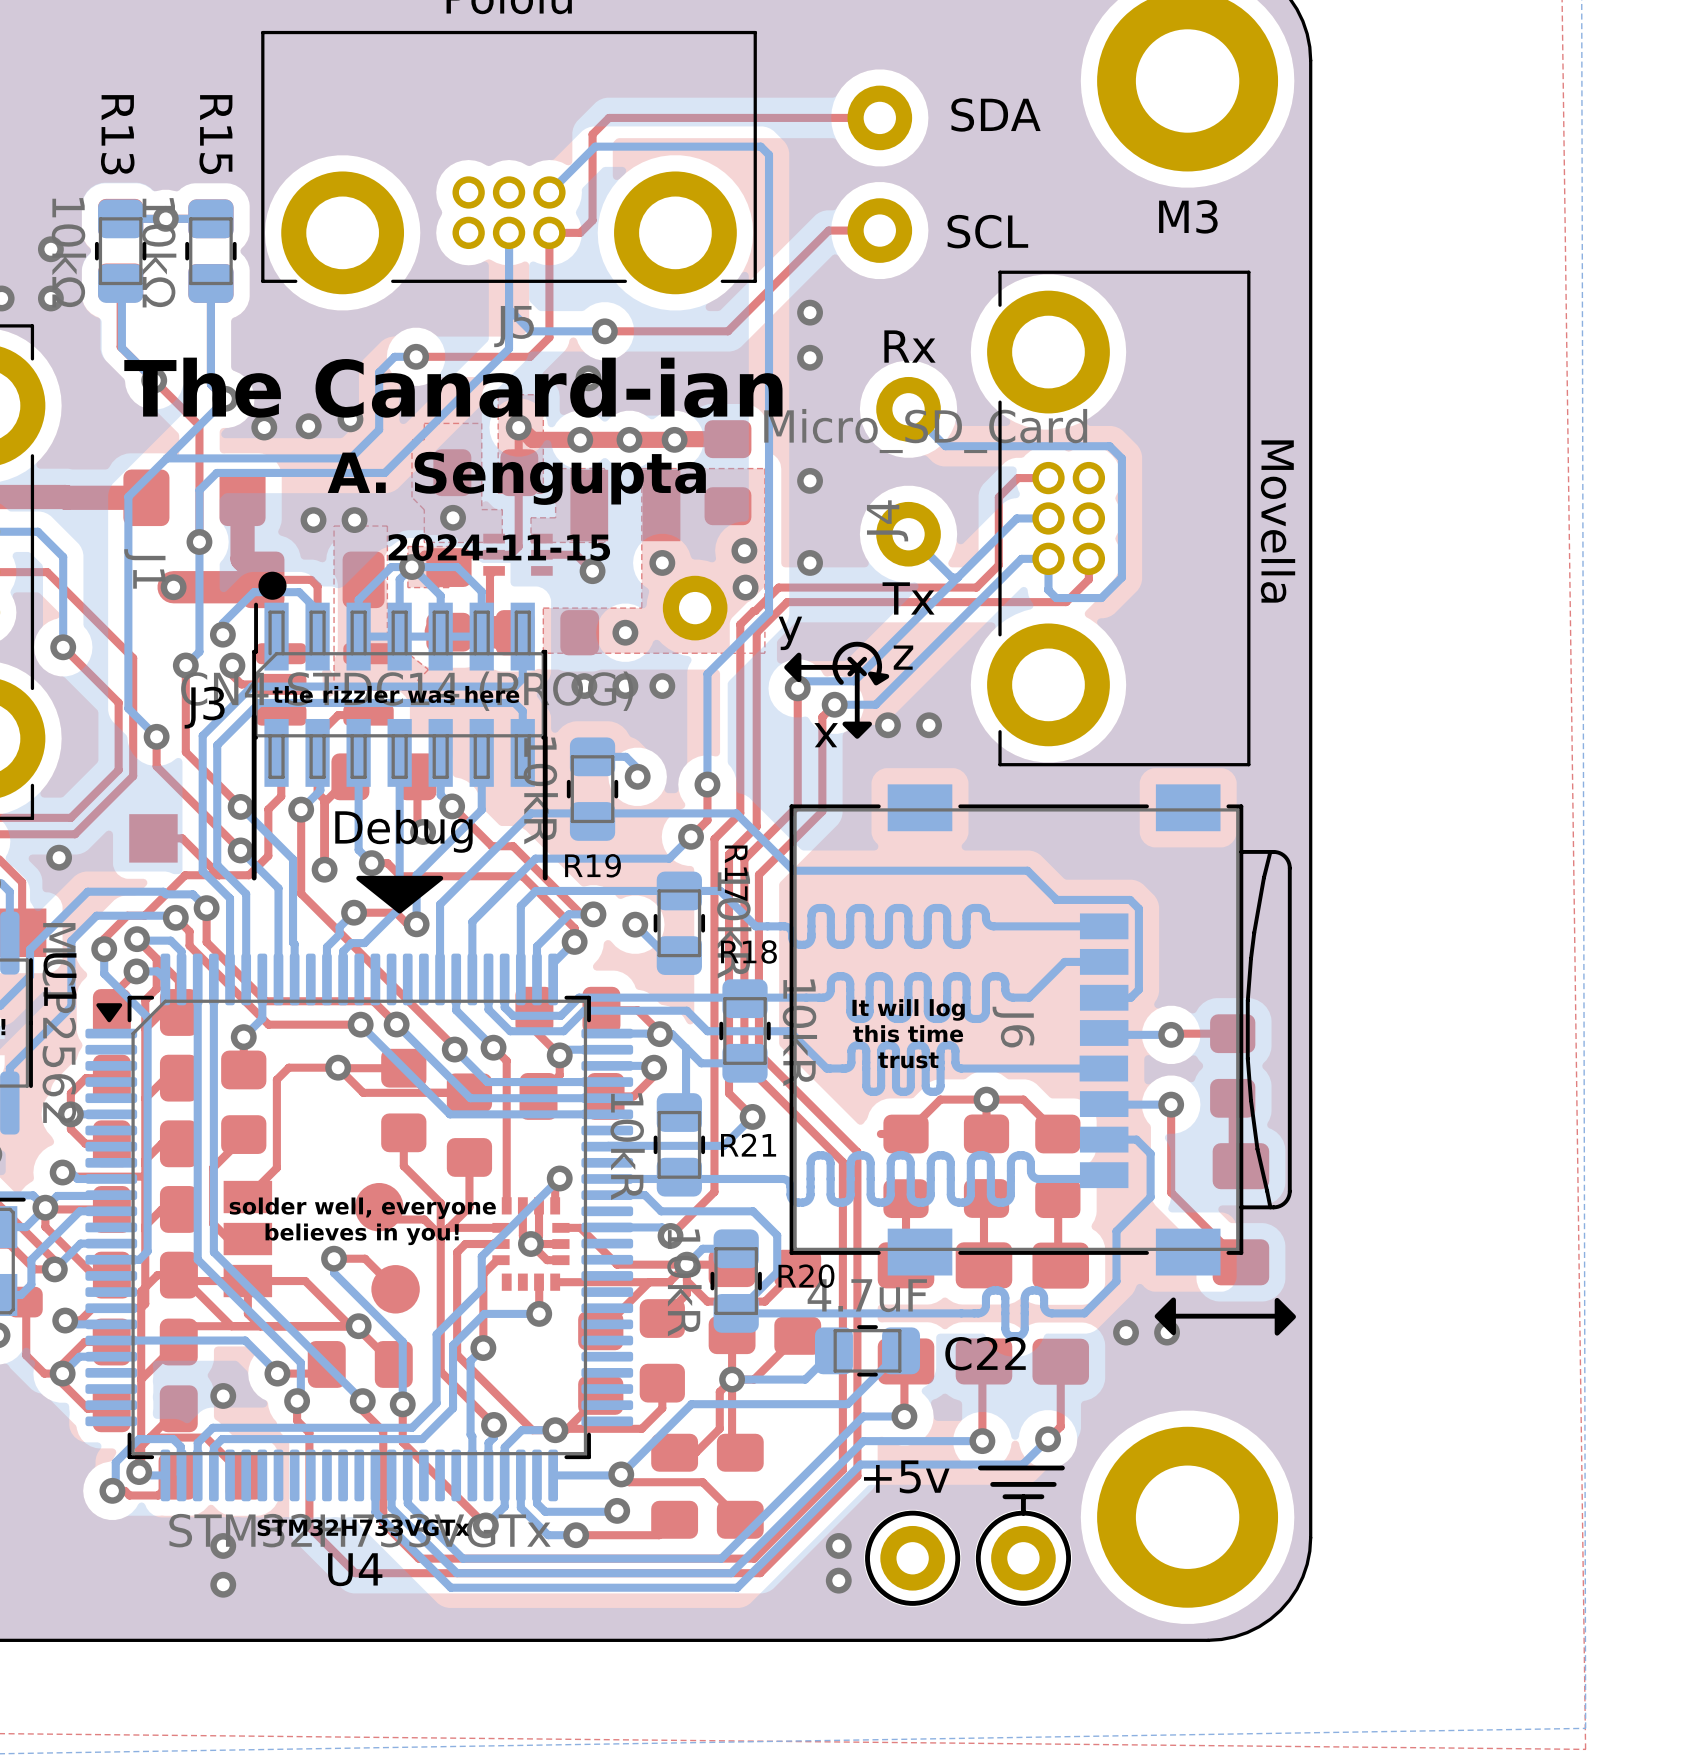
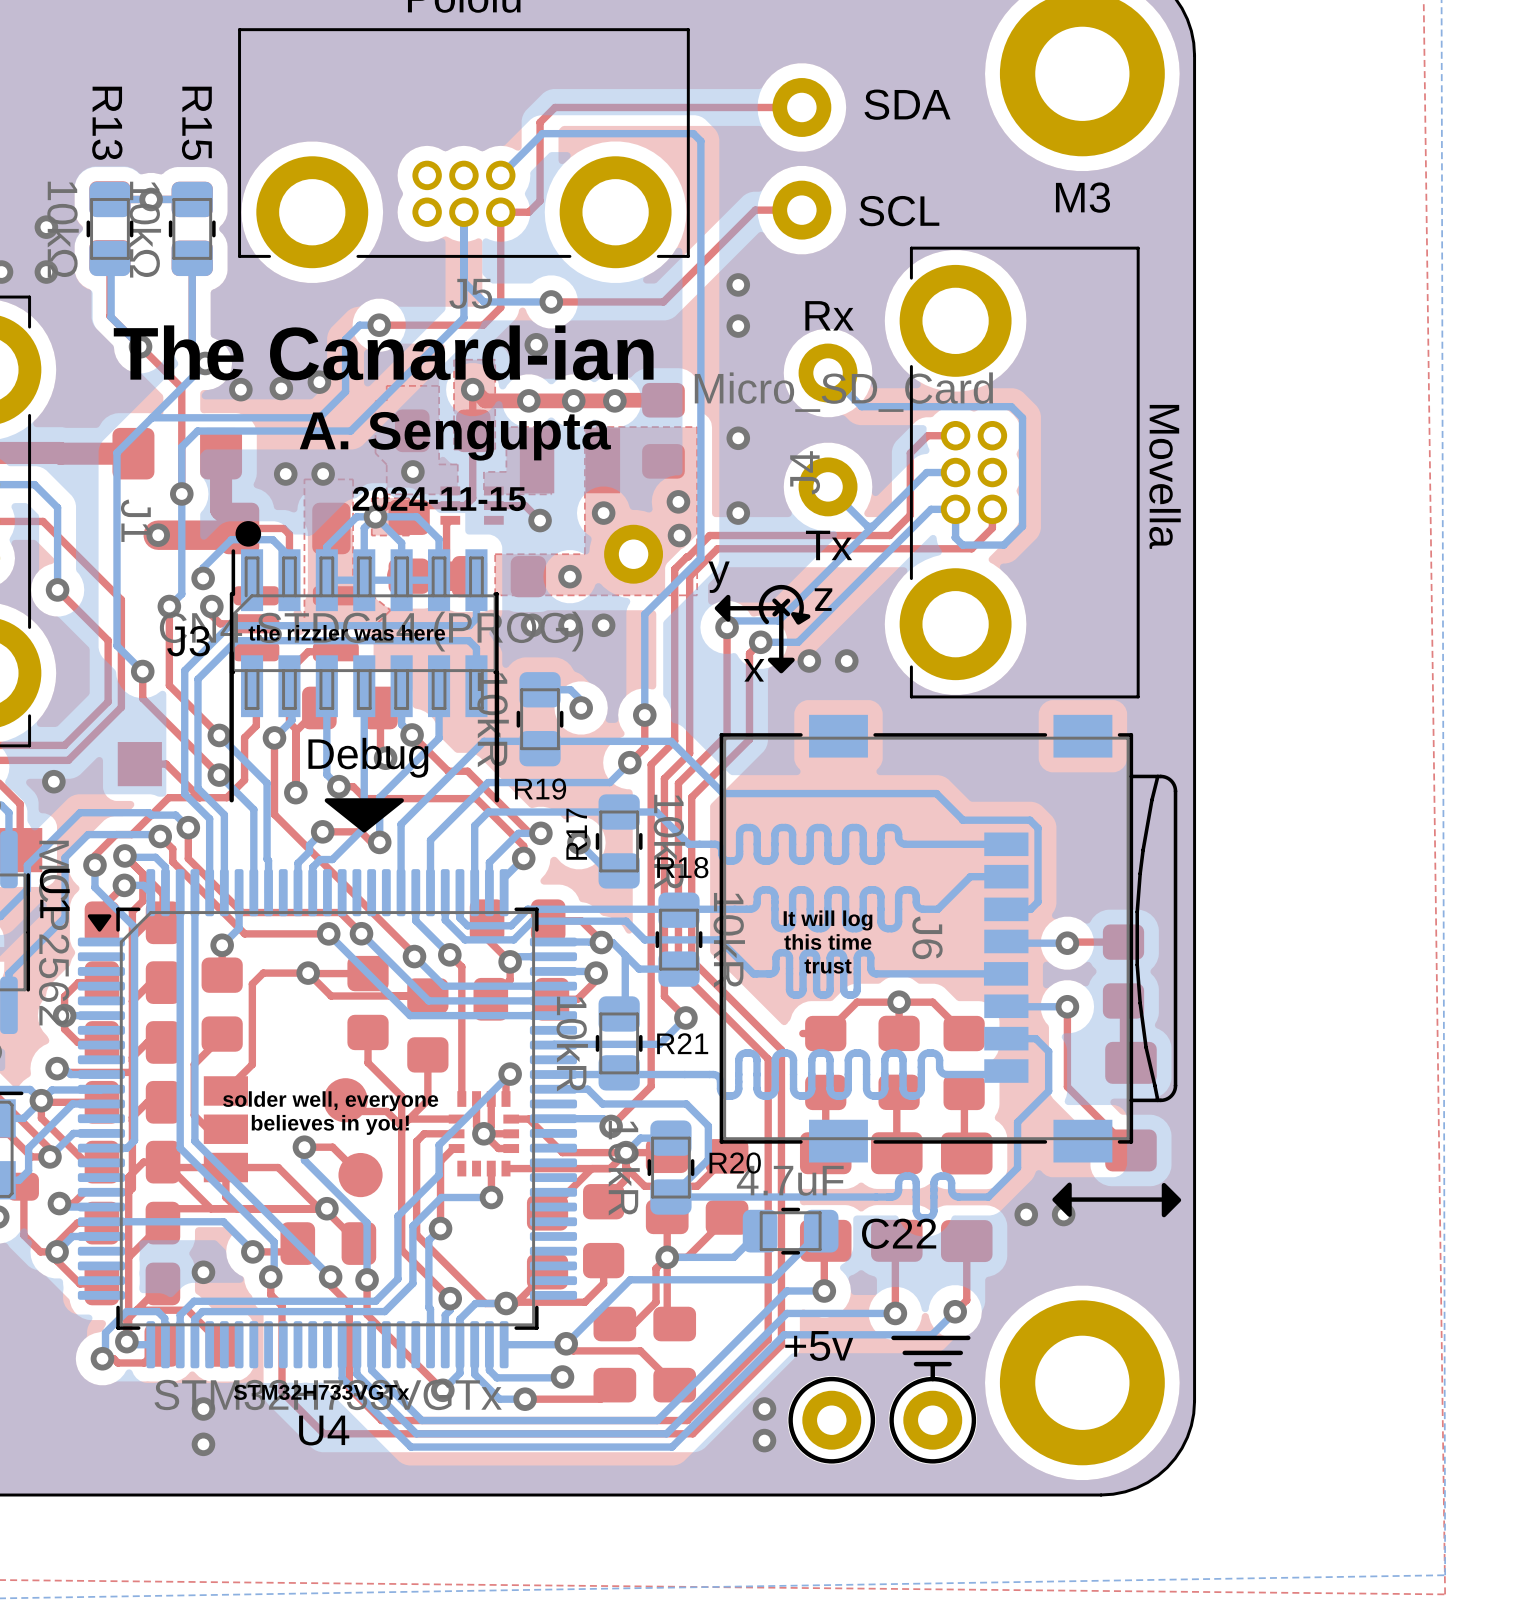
R17 name rotation: 0° (736, 873) -> 180° (576, 834)
R17 name position: R17 (736, 873) -> R17 (576, 834)

